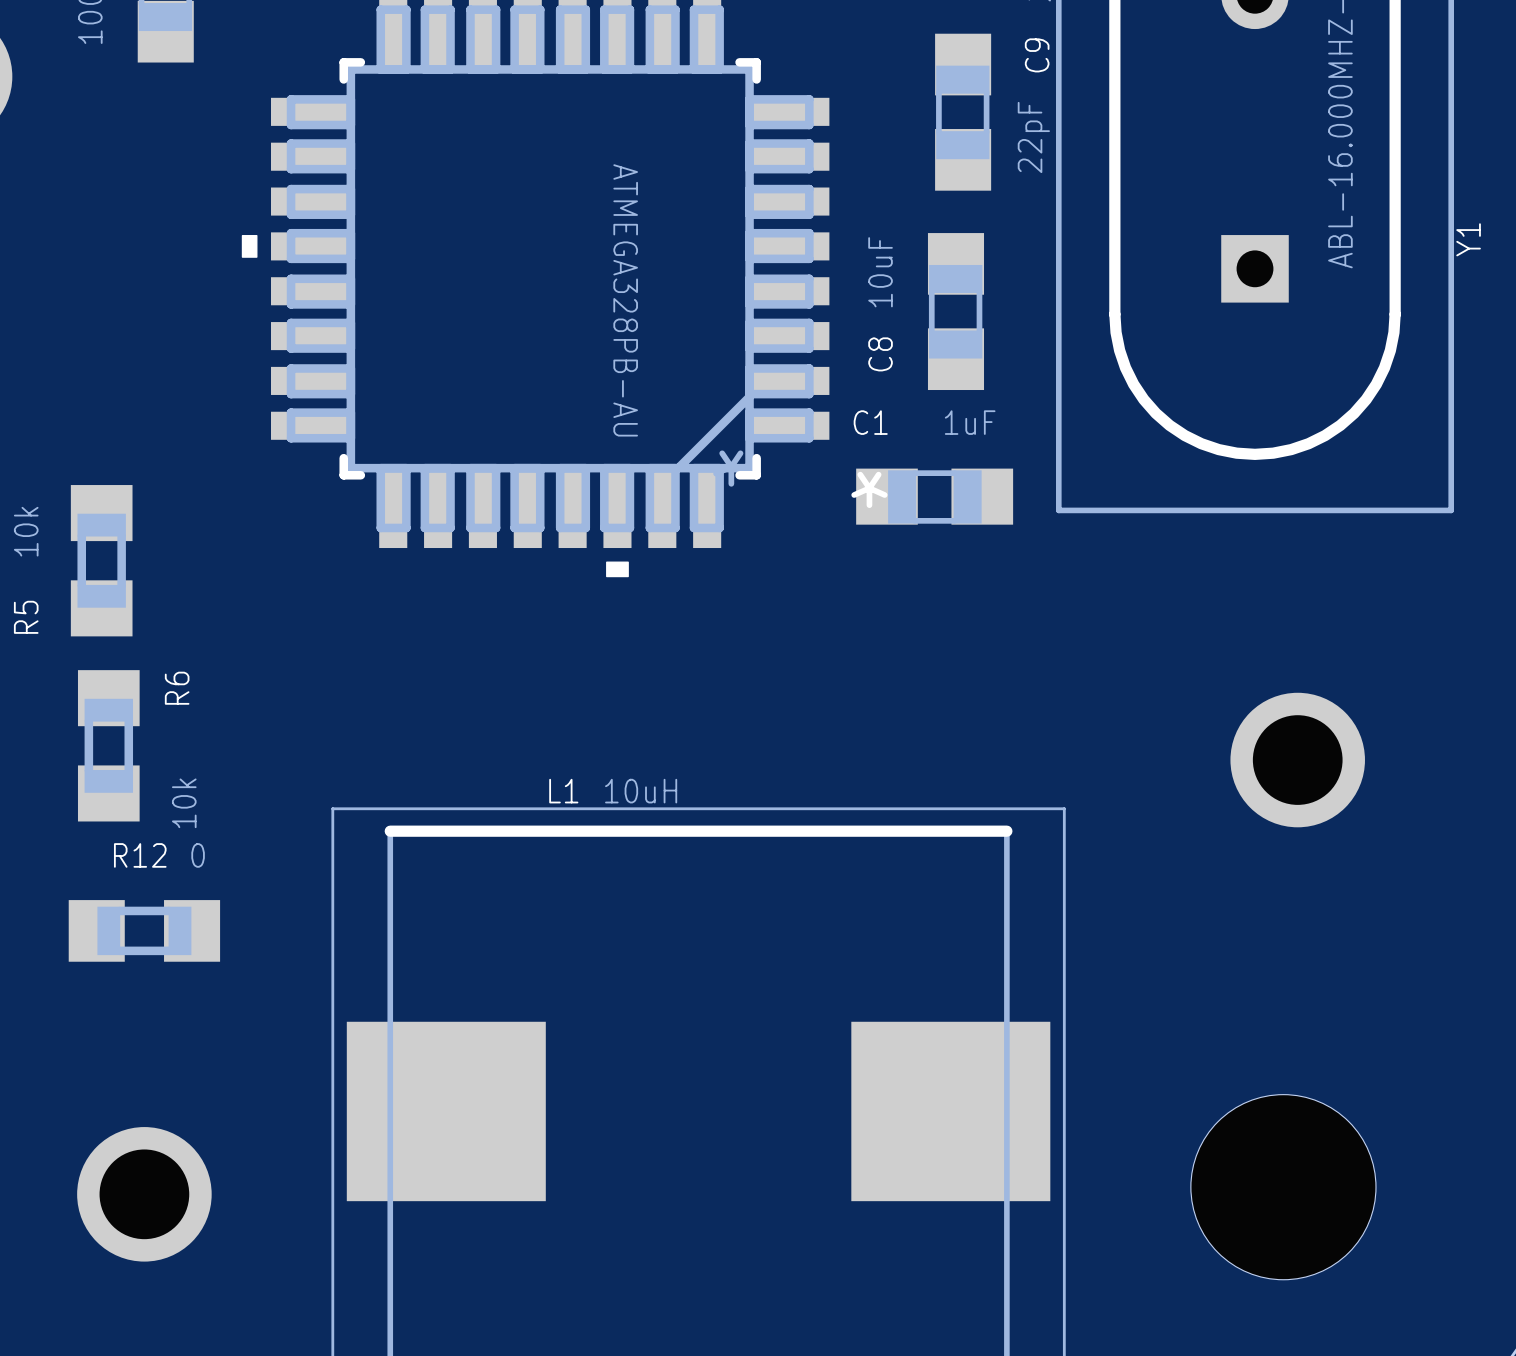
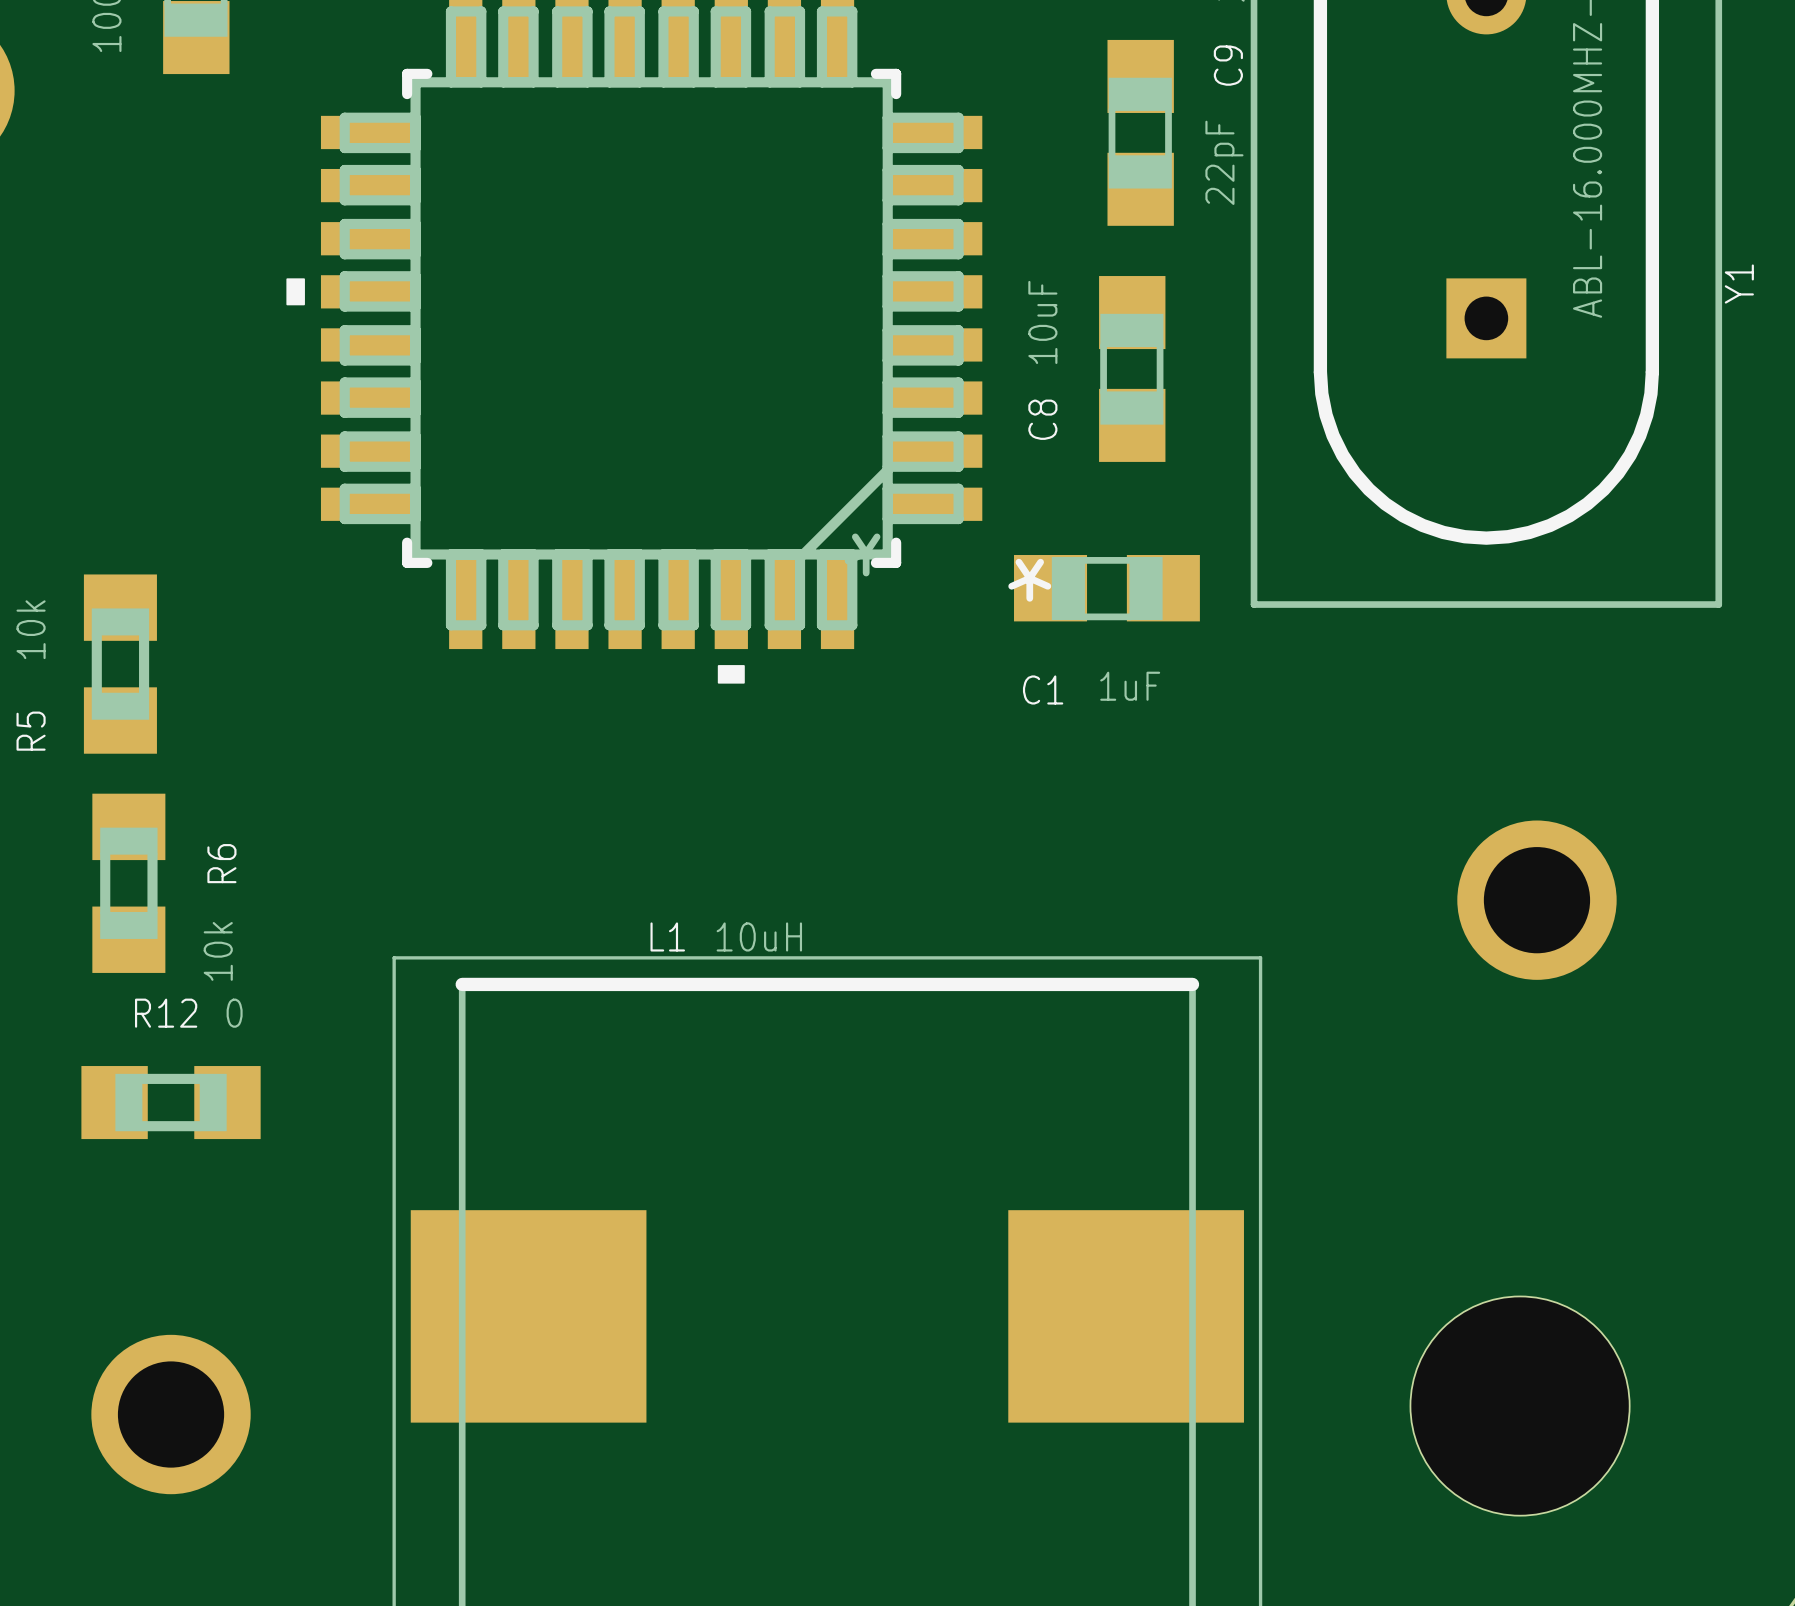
part value: ATMEGA328PB-AU (625, 300) -> none
C1 name position: C1 (870, 422) -> C1 (1043, 689)
C1 value position: 1uF (970, 422) -> 1uF (1130, 686)
R6 name position: R6 (177, 688) -> R6 (221, 863)

